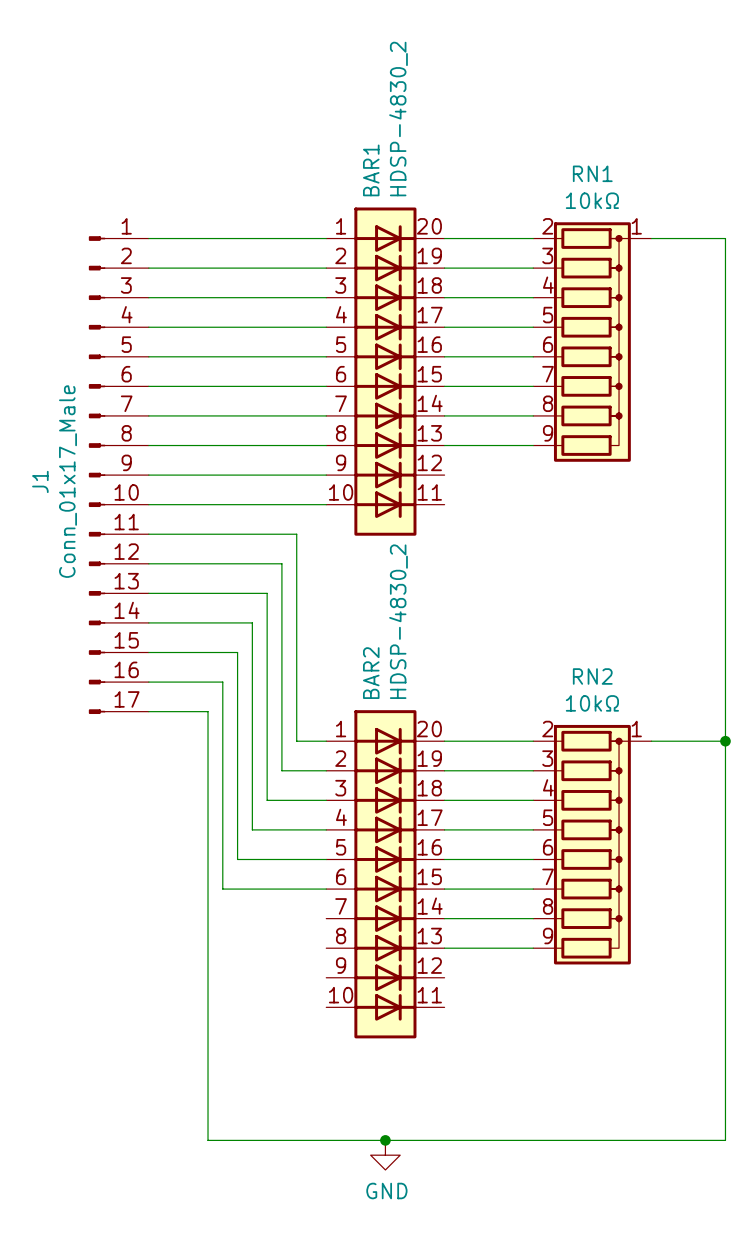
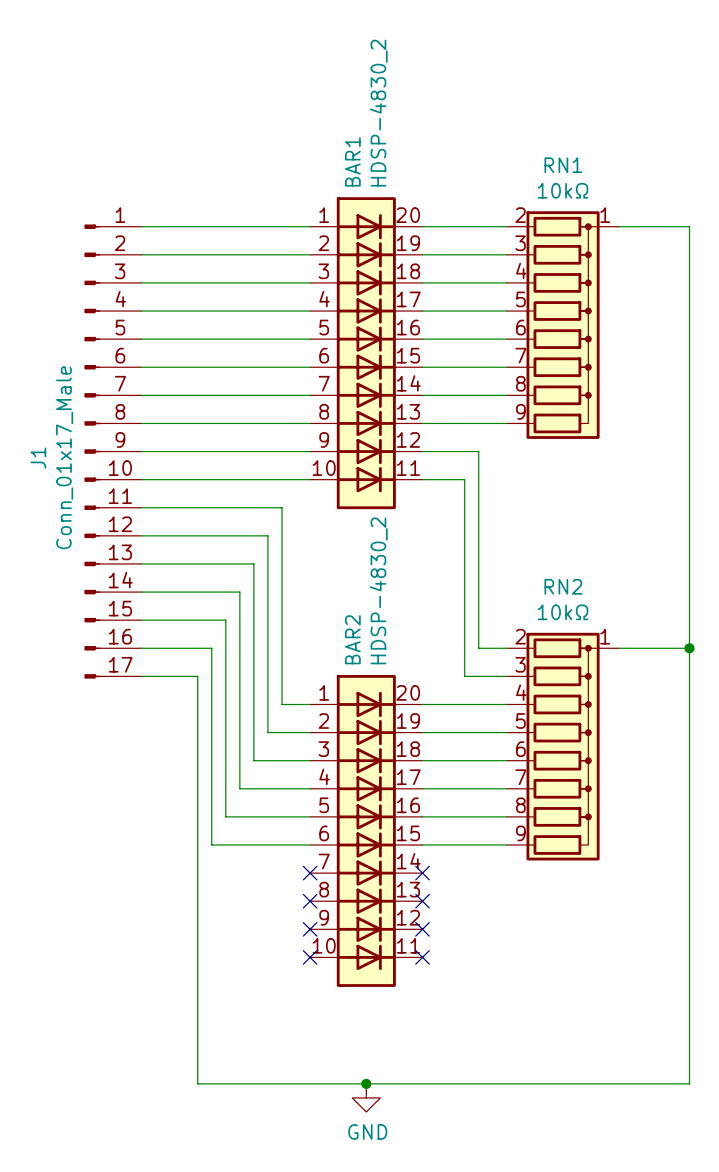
wire: none -> (422, 451) (478, 451) (478, 648) (506, 648)
wire: none -> (422, 479) (464, 479) (464, 676) (506, 676)
wire: (651, 741) (725, 741) -> (619, 648) (689, 648)
junction position: (725, 741) -> (689, 648)
RN2 position: (592, 844) -> (563, 746)
no-connect mark: none -> (310, 873)
wire: (444, 918) (533, 918) -> none
no-connect mark: none -> (422, 873)
no-connect mark: none -> (310, 901)
wire: (444, 948) (533, 948) -> none
no-connect mark: none -> (422, 901)
no-connect mark: none -> (310, 929)
no-connect mark: none -> (422, 929)
no-connect mark: none -> (310, 957)
no-connect mark: none -> (422, 957)

